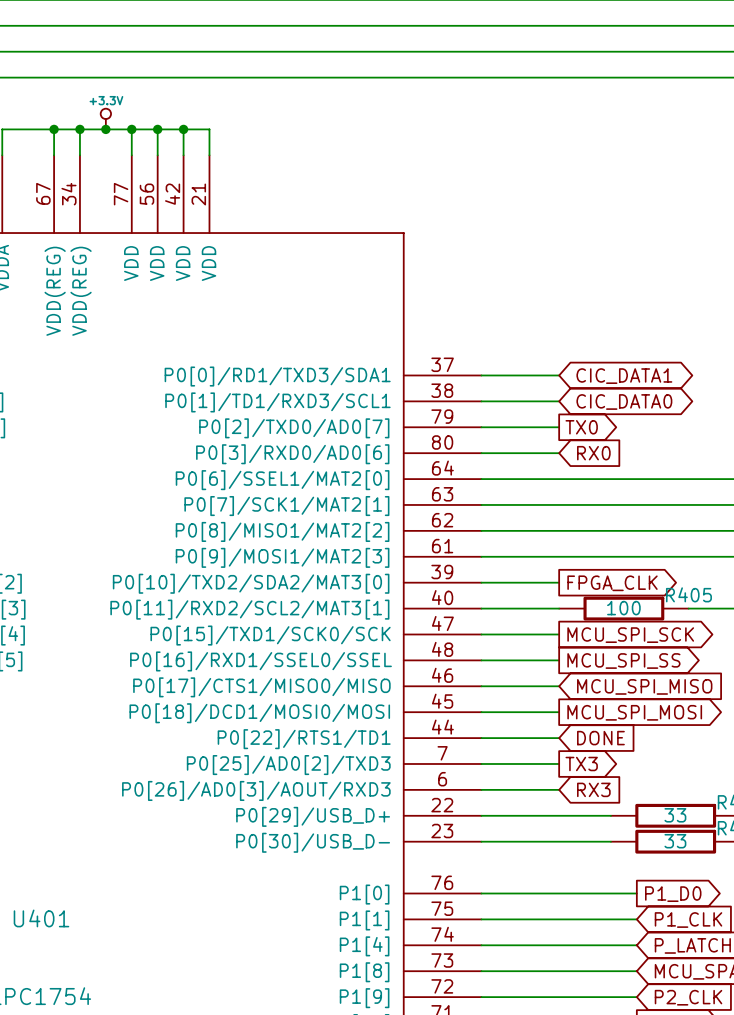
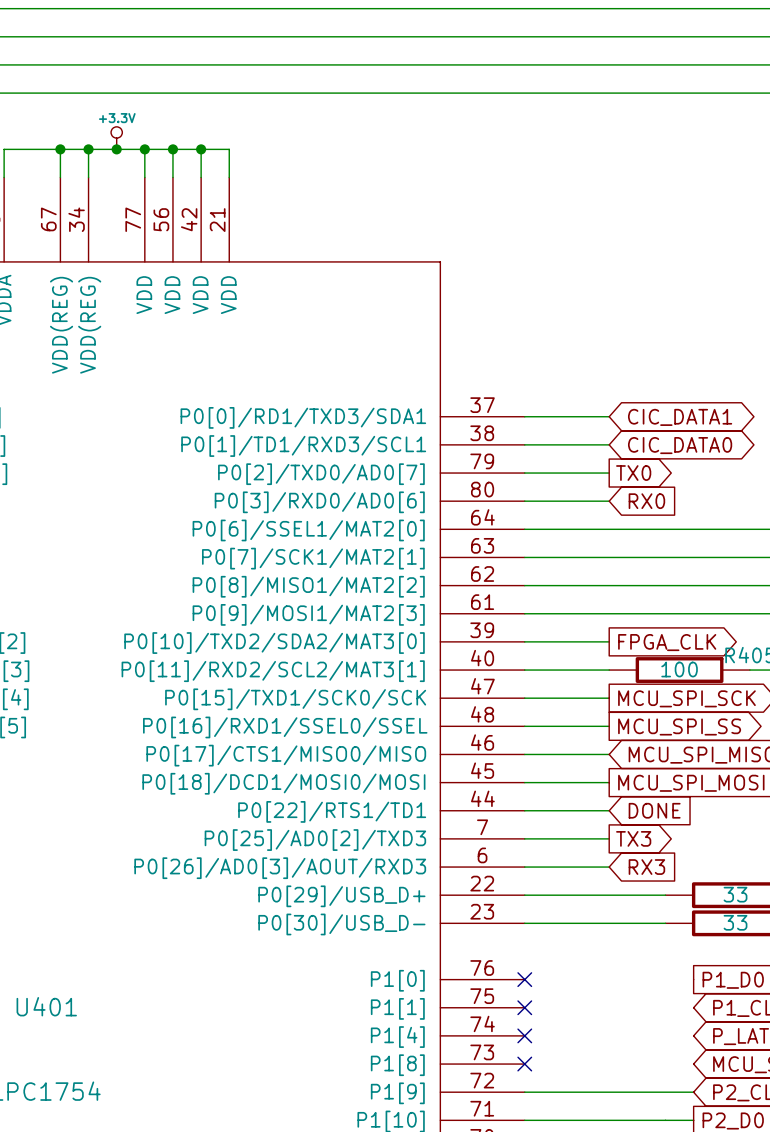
wire: (481, 893) (636, 893) -> none
no-connect mark: none -> (524, 979)
wire: (481, 919) (636, 919) -> none
no-connect mark: none -> (524, 1007)
wire: (481, 945) (636, 945) -> none
no-connect mark: none -> (524, 1035)
wire: (481, 971) (636, 971) -> none
no-connect mark: none -> (524, 1064)

